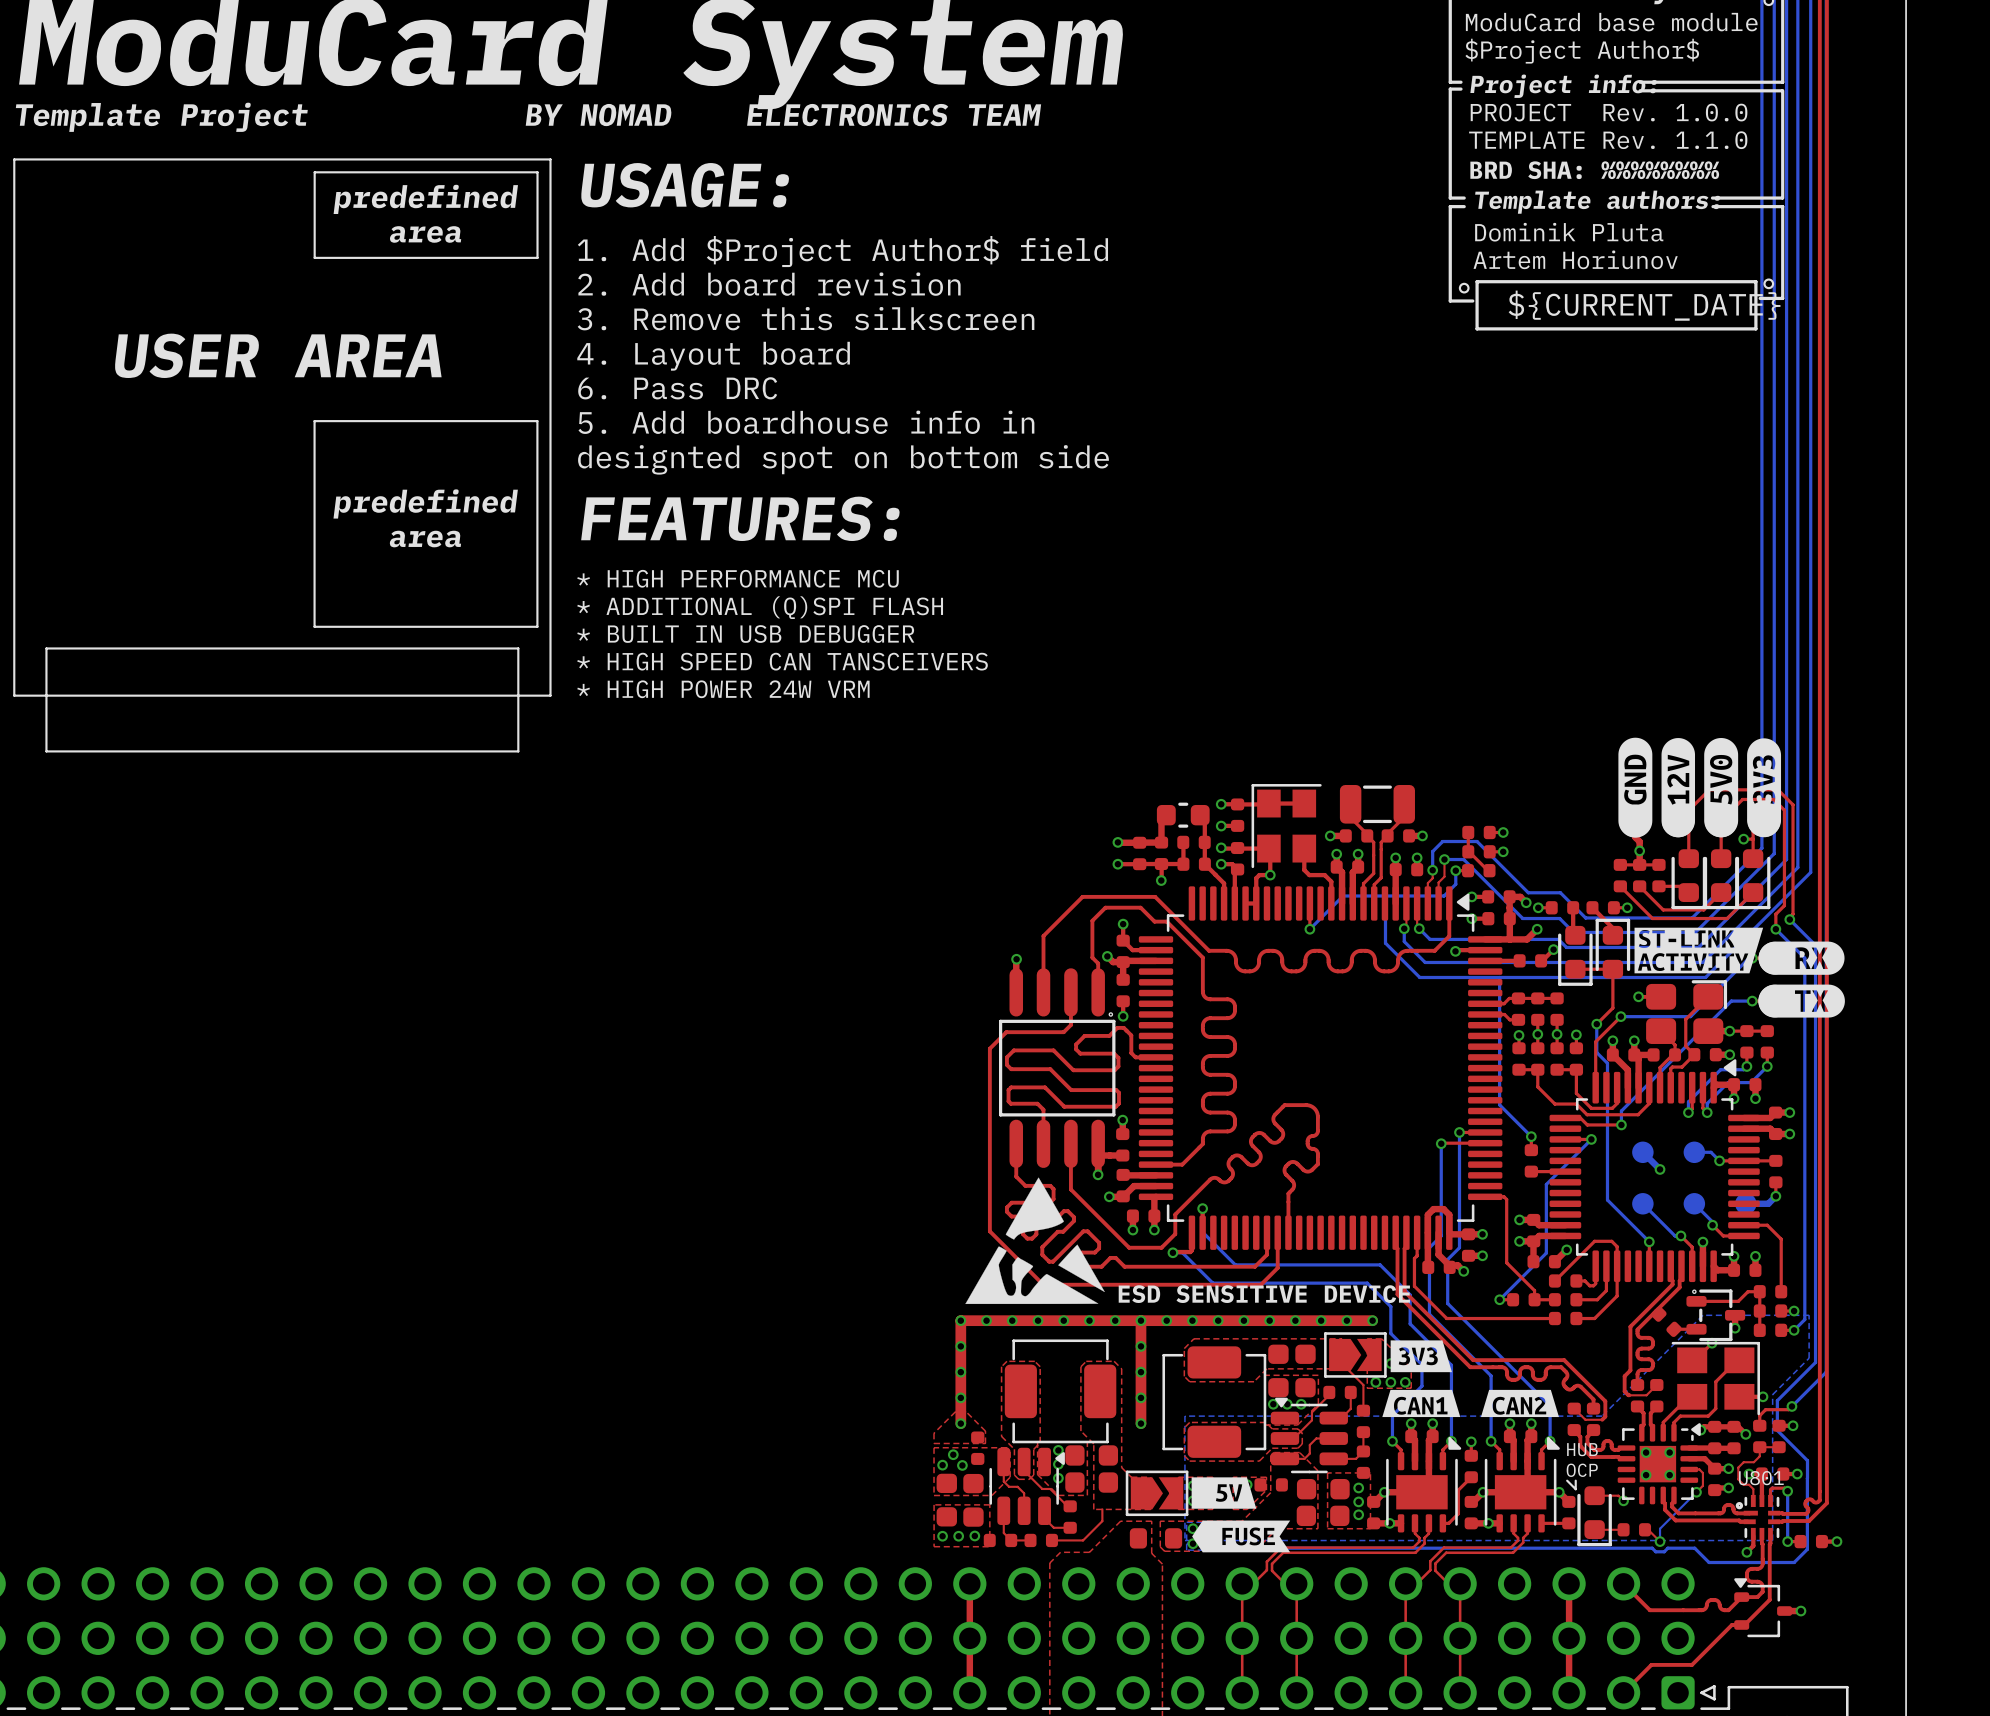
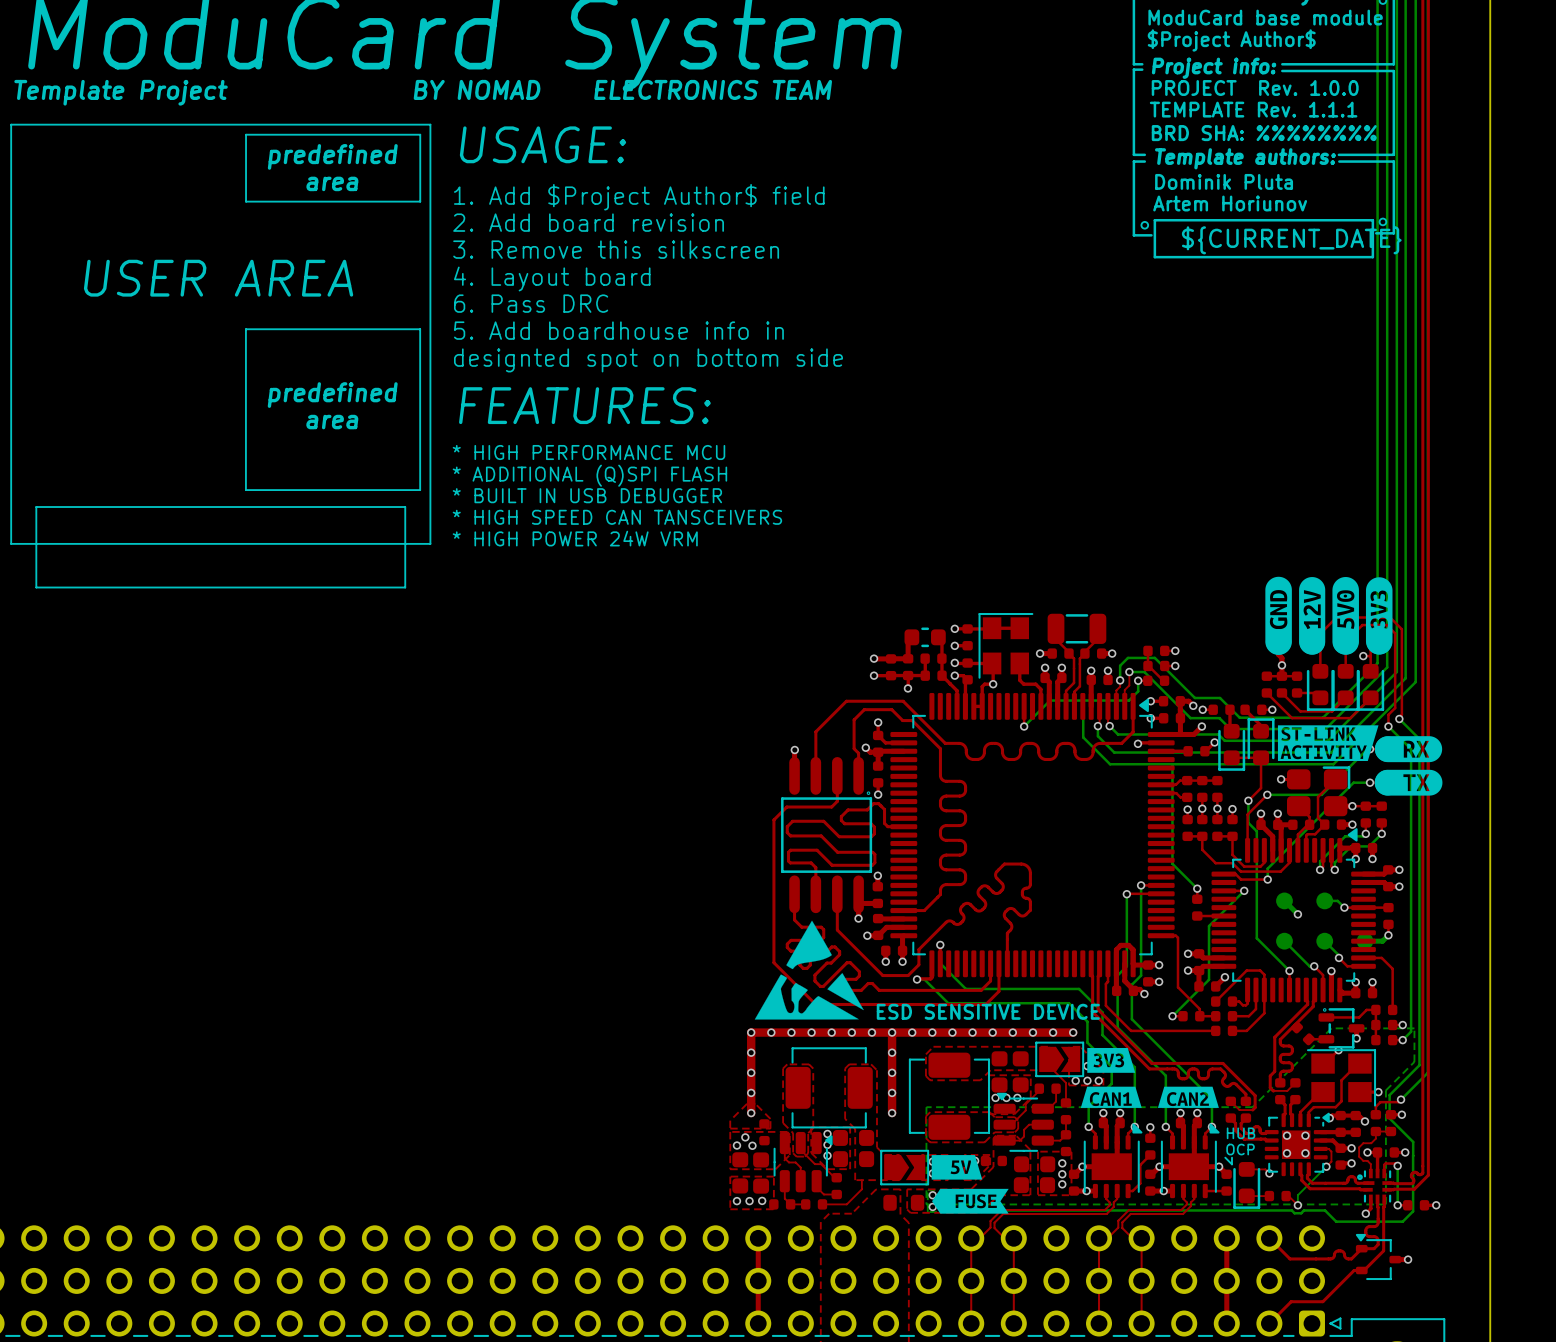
text: TEMPLATE Rev. 1.1.0 (1608, 140) -> TEMPLATE Rev. 1.1.1 (1253, 109)
U801 name: U801 (1761, 1478) -> none

